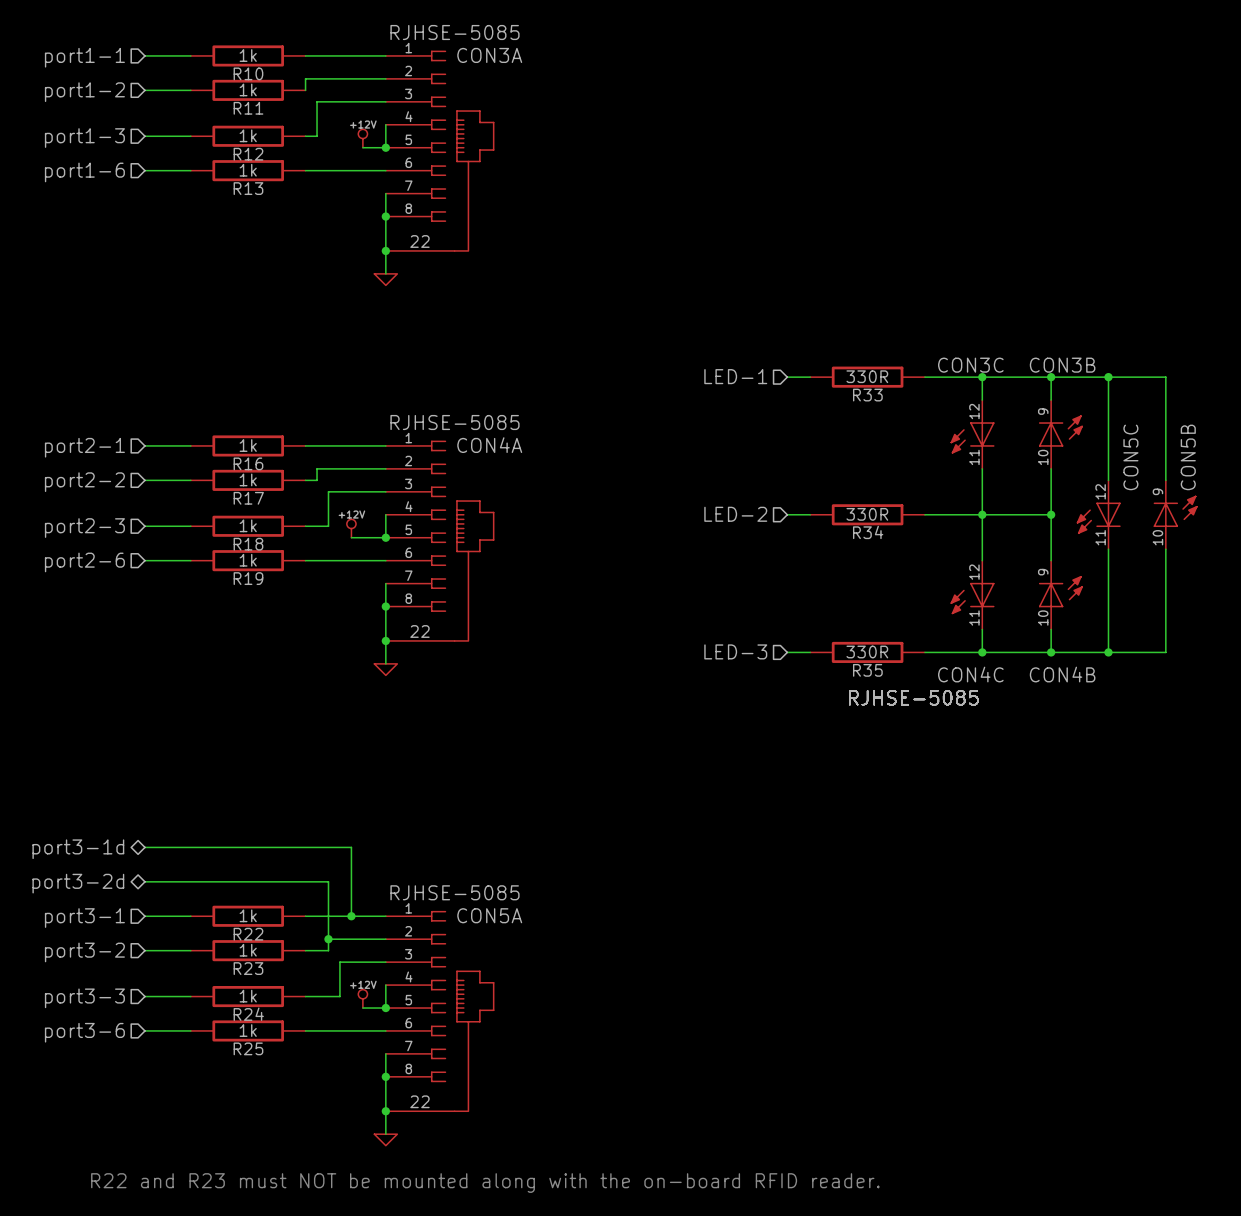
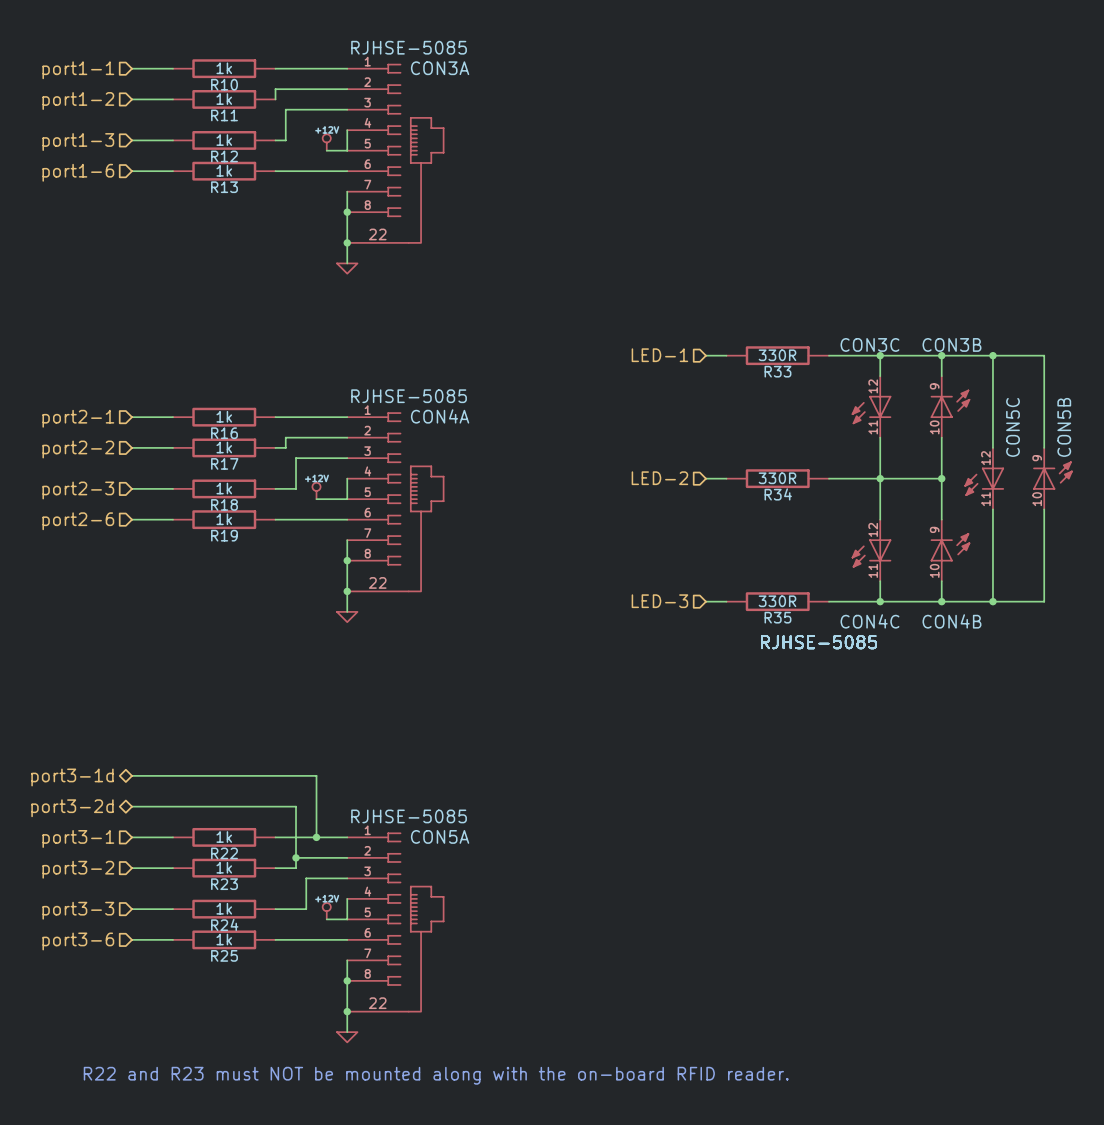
junction: (385, 147) -> none
junction: (385, 537) -> none
junction: (385, 1008) -> none

